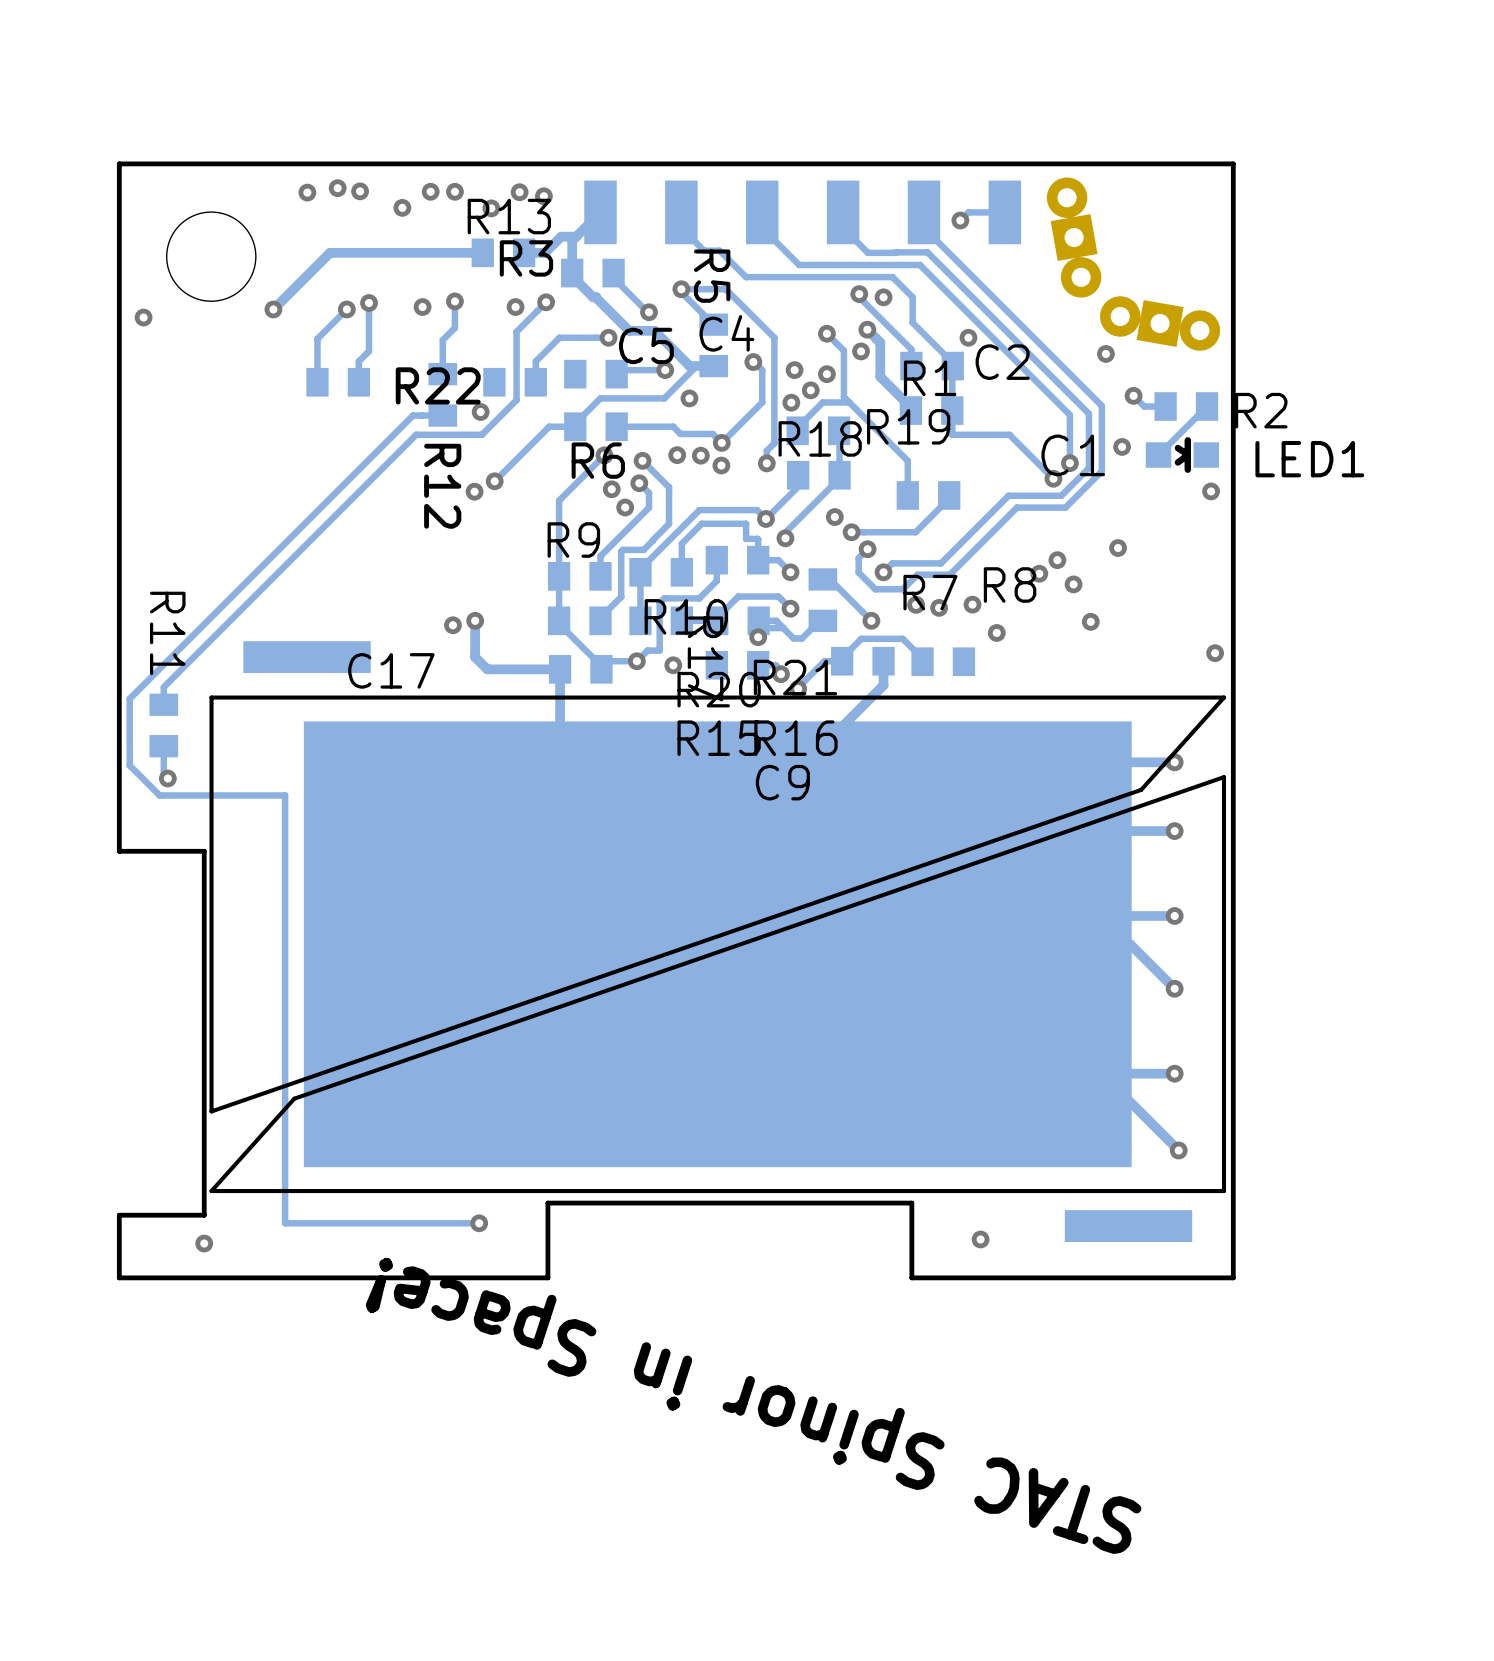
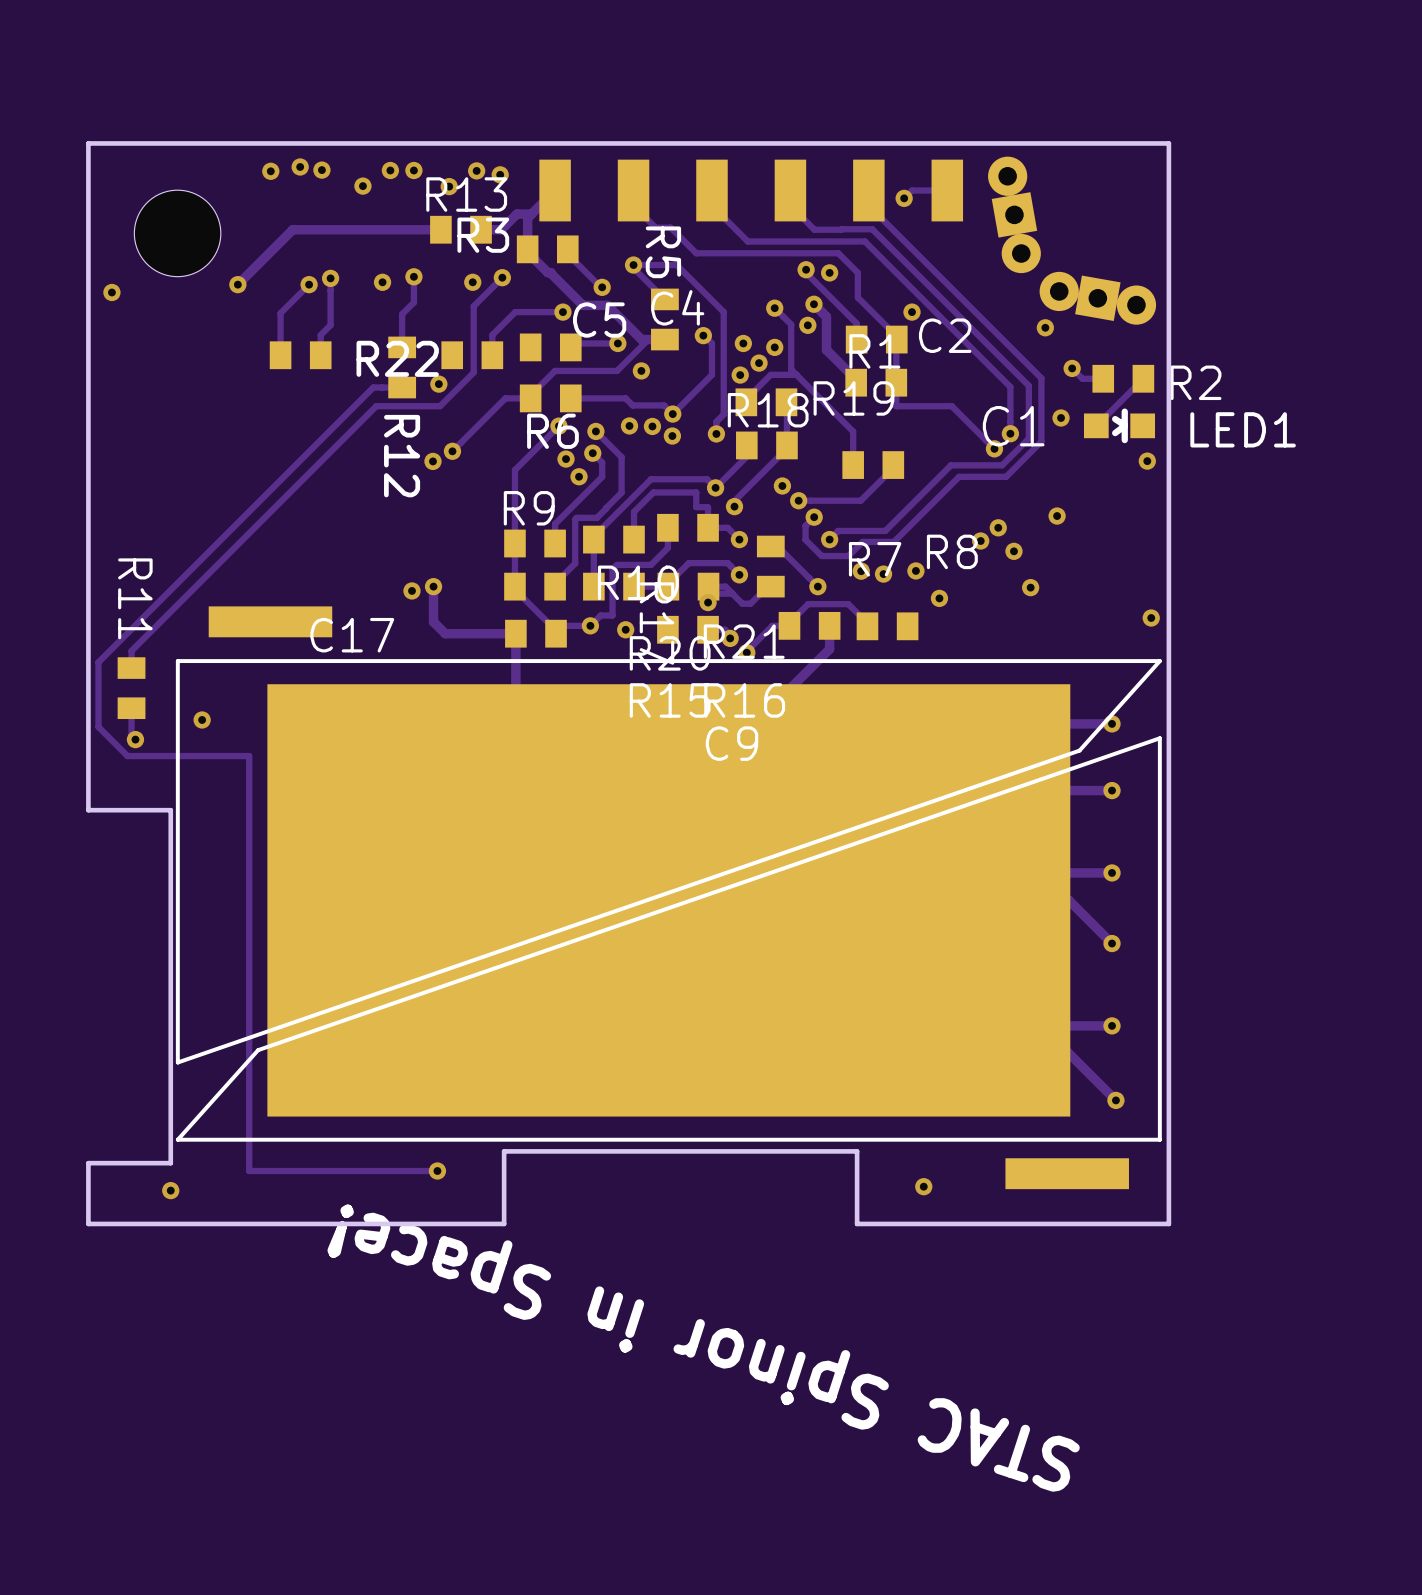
via: none -> (202, 719)

